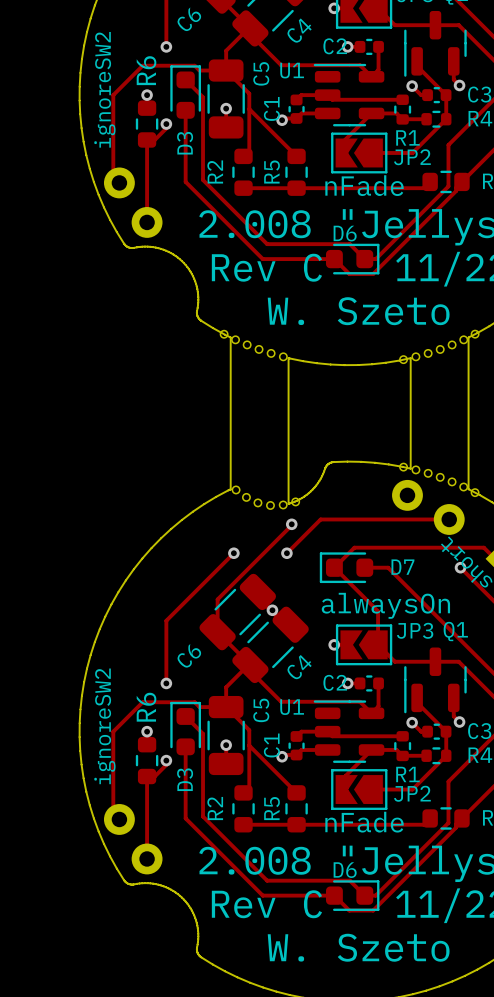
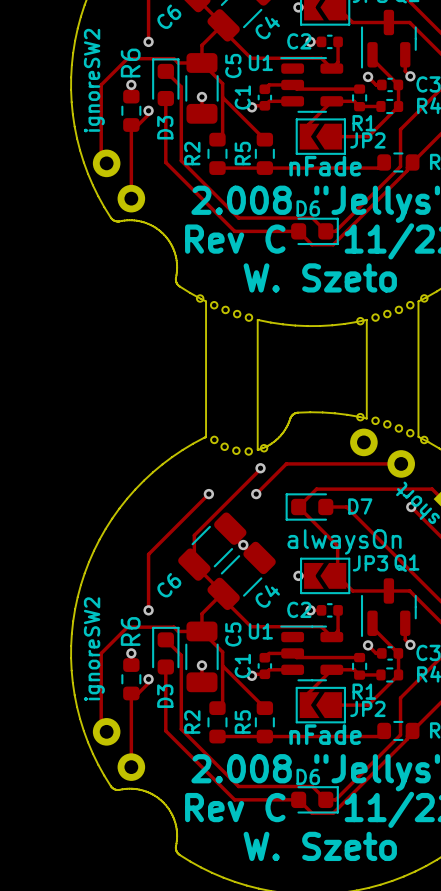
part: (235, 339) -> none
part: (463, 339) -> none
part: none -> (214, 305)
part: none -> (410, 305)
part: (247, 344) -> none
part: (452, 344) -> none
part: none -> (225, 309)
part: none -> (398, 309)
part: (259, 349) -> none
part: (440, 349) -> none
part: none -> (237, 314)
part: none -> (387, 314)
part: (271, 353) -> none
part: (428, 353) -> none
part: none -> (248, 317)
part: none -> (375, 317)
part: (283, 356) -> none
part: (415, 356) -> none
part: (415, 469) -> none
part: none -> (375, 420)
part: (428, 473) -> none
part: none -> (387, 424)
part: (440, 477) -> none
part: none -> (398, 428)
part: (452, 481) -> none
part: none -> (410, 433)
part: (463, 487) -> none
part: (236, 489) -> none
part: none -> (214, 439)
part: (246, 497) -> none
part: none -> (224, 446)
part: (257, 502) -> none
part: none -> (236, 450)
part: (283, 504) -> none
part: (270, 505) -> none
part: none -> (248, 451)

